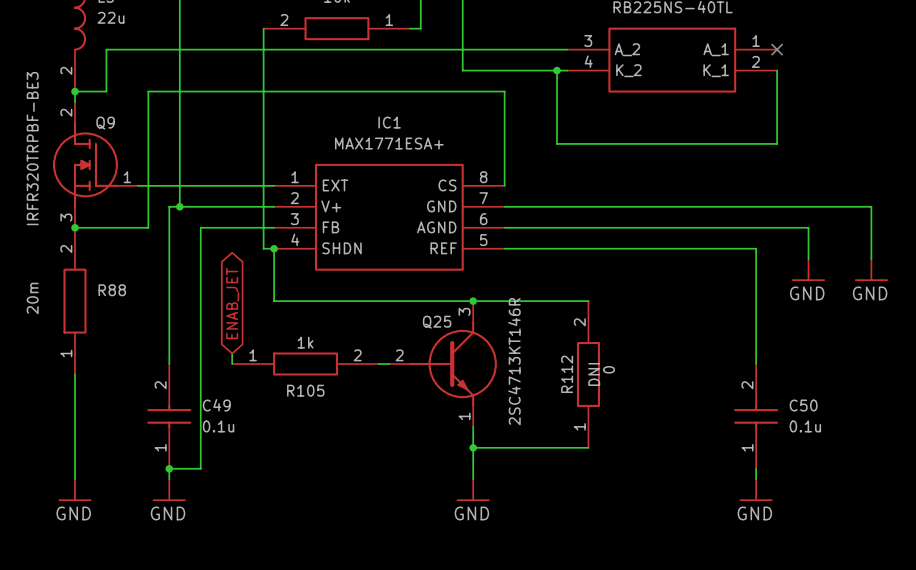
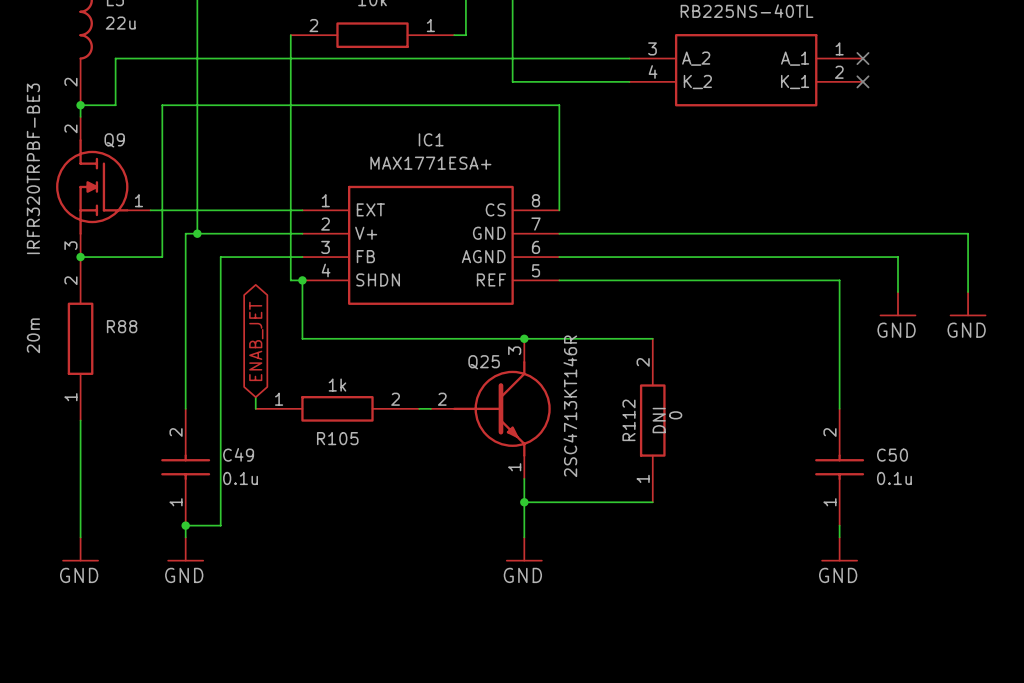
wire: (557, 70) (557, 143) (777, 143) (777, 70) -> none
junction: (557, 70) -> none
no-connect mark: none -> (862, 81)

